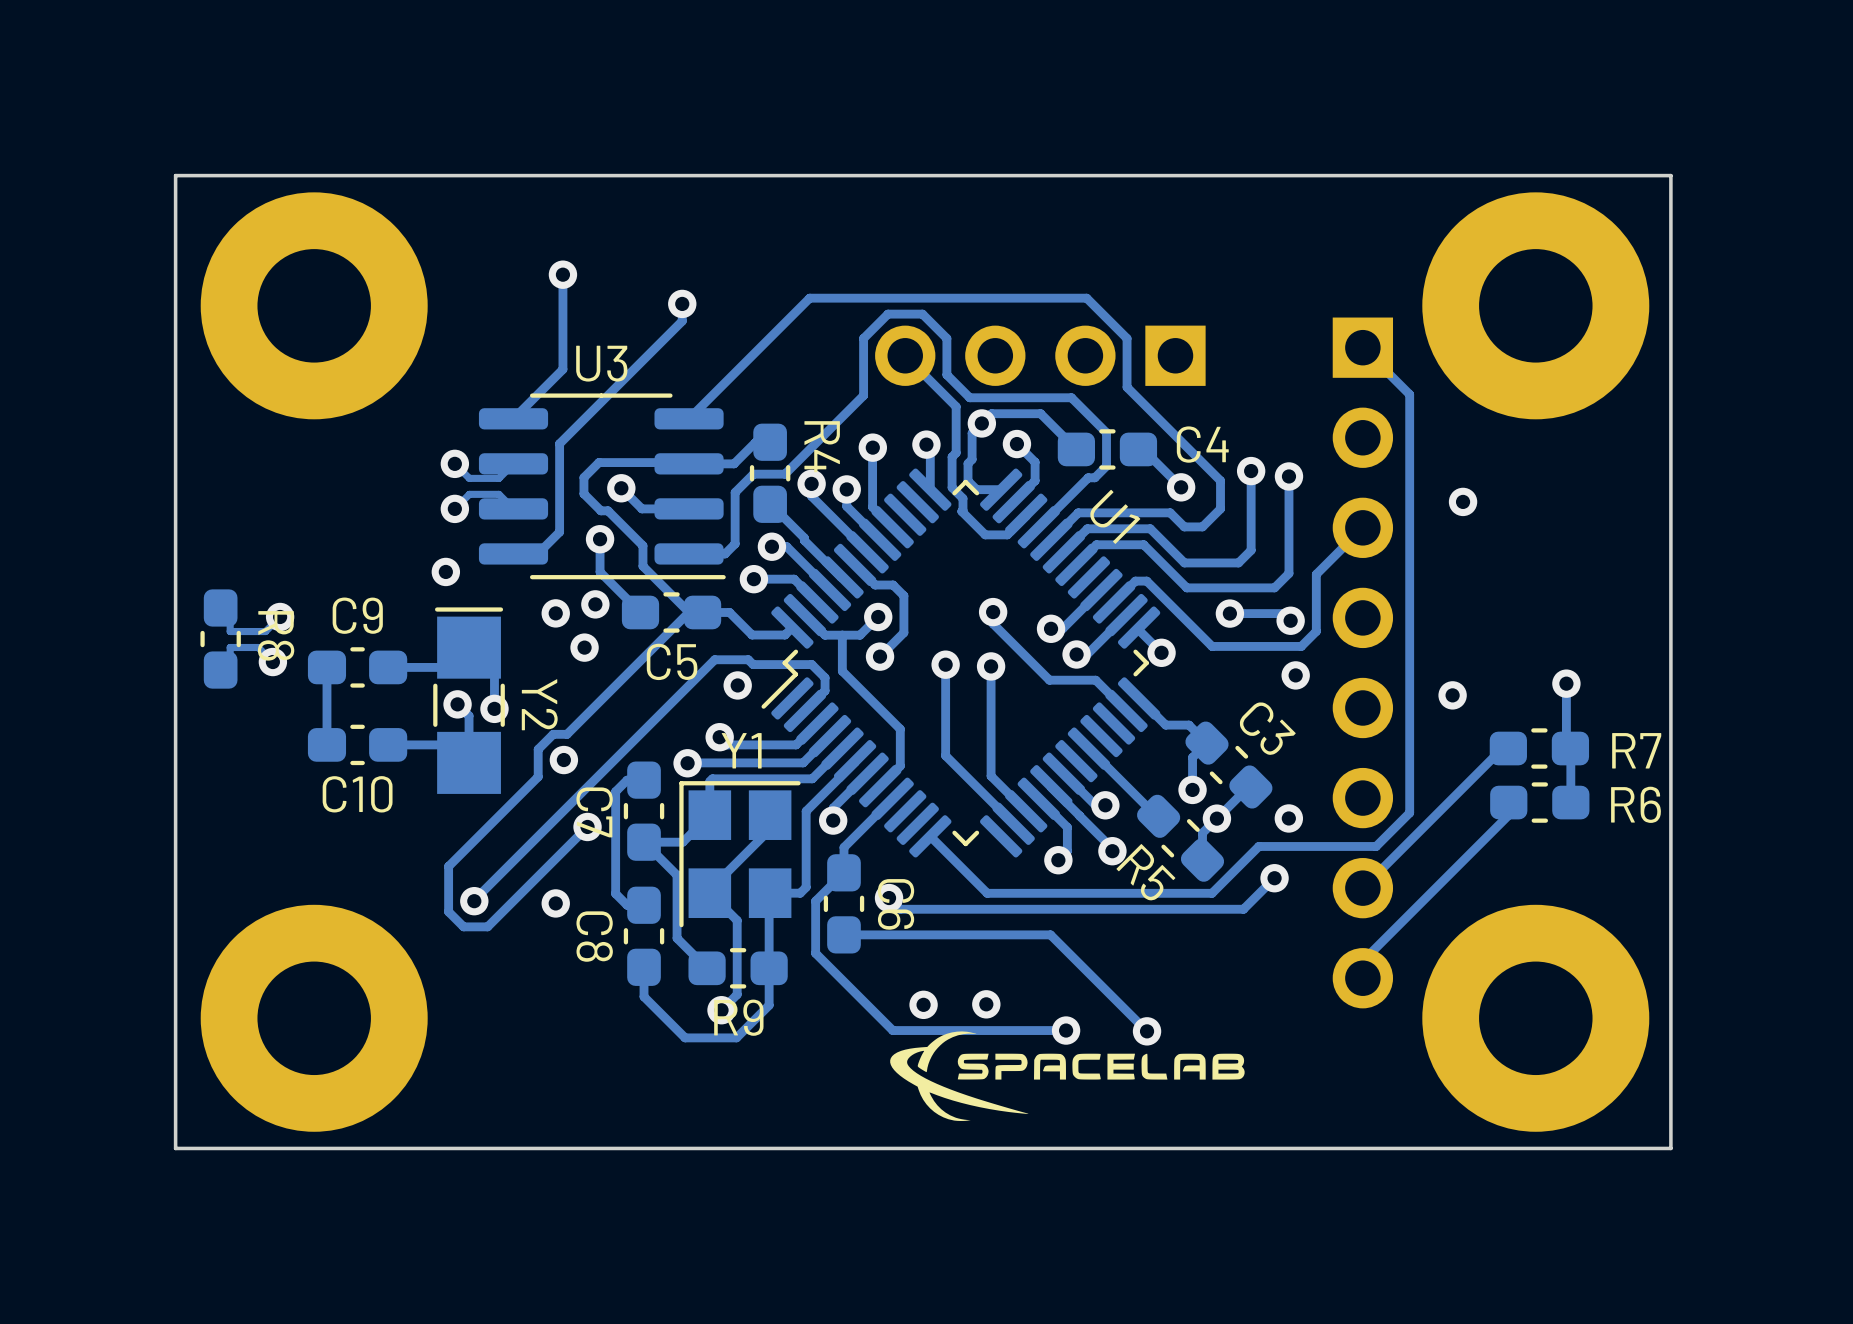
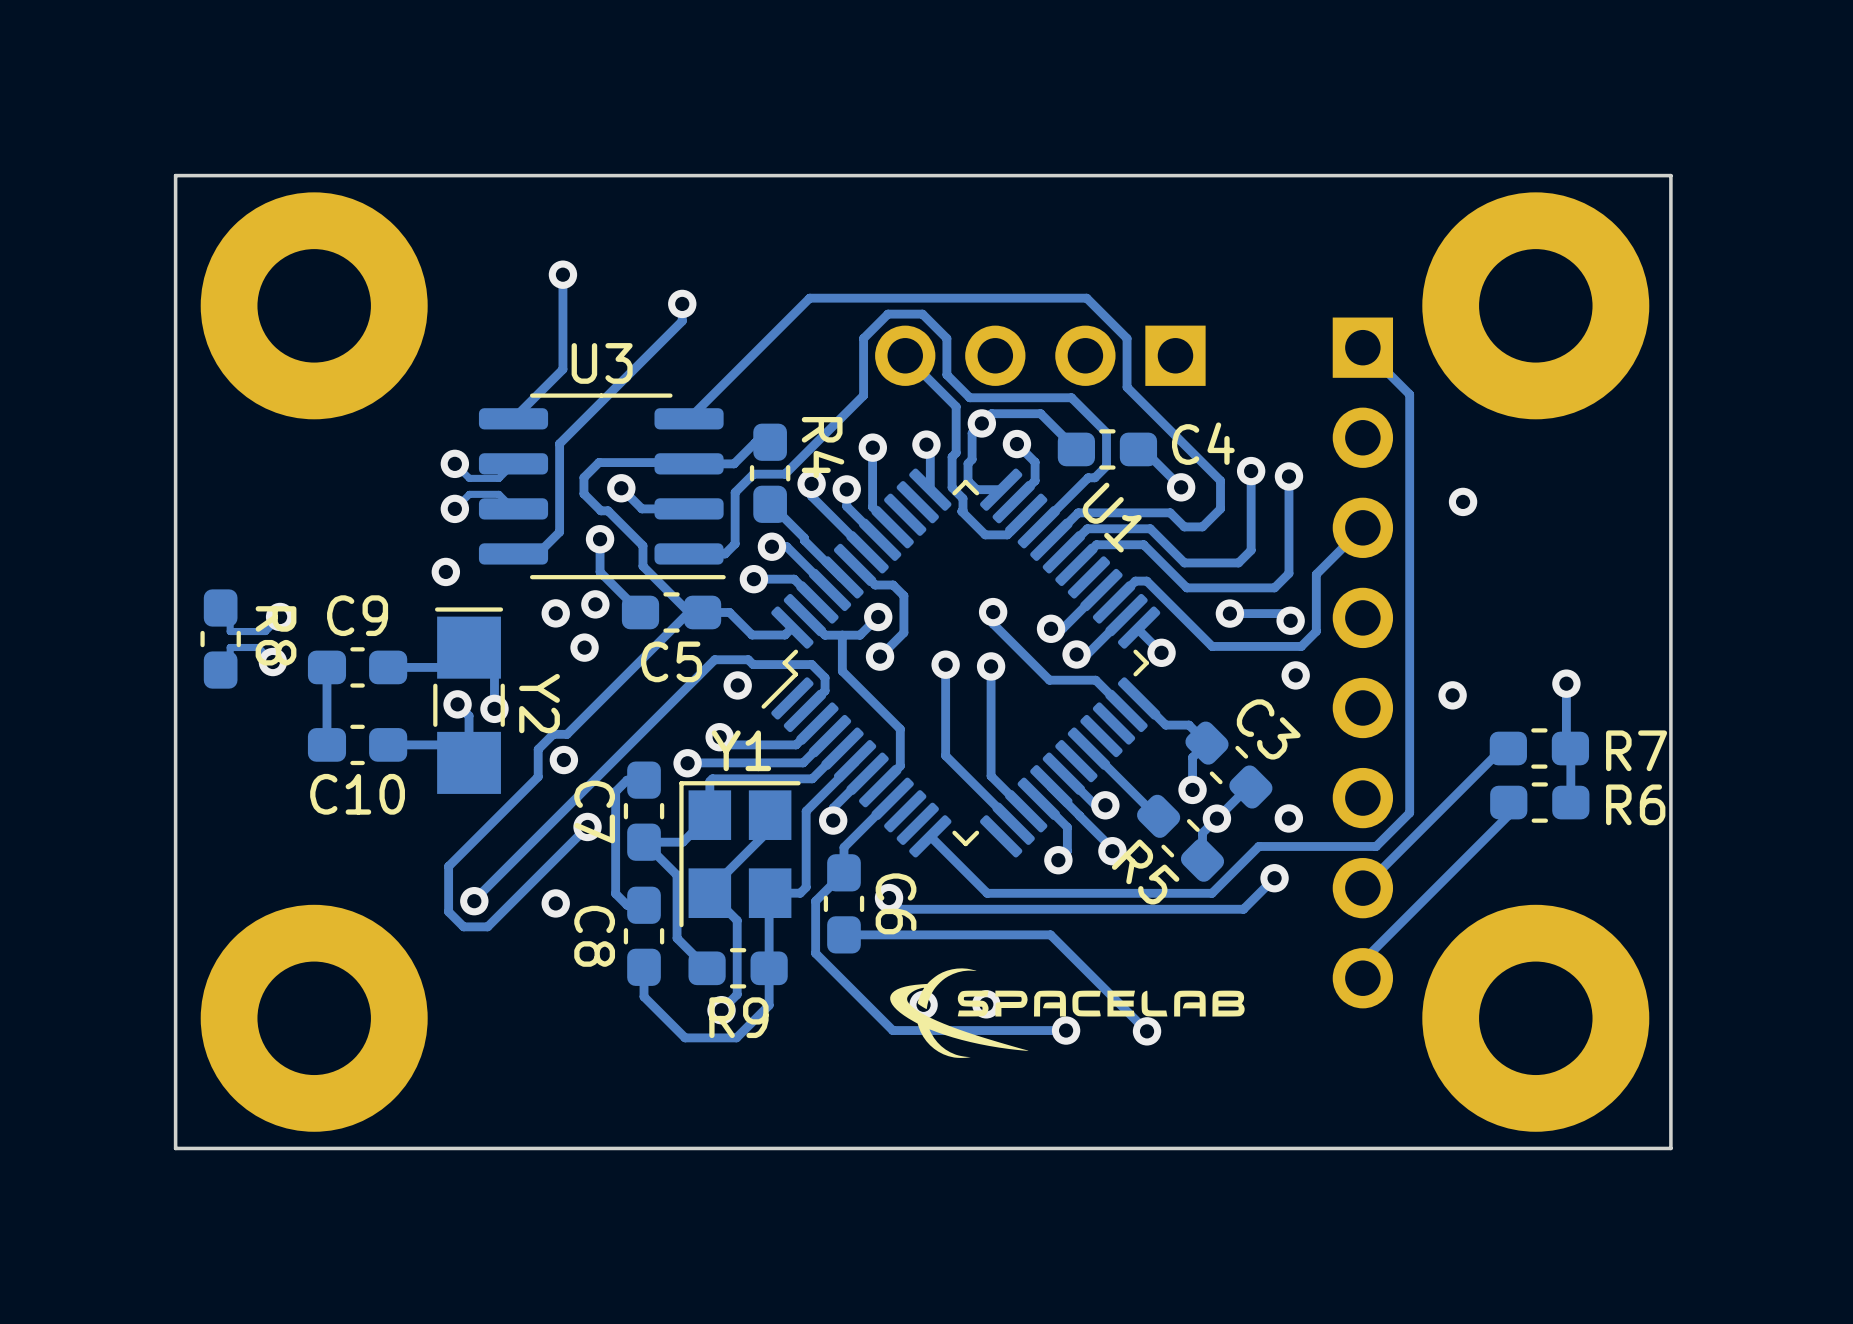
drawing position: (1067, 1076) -> (1067, 1013)

